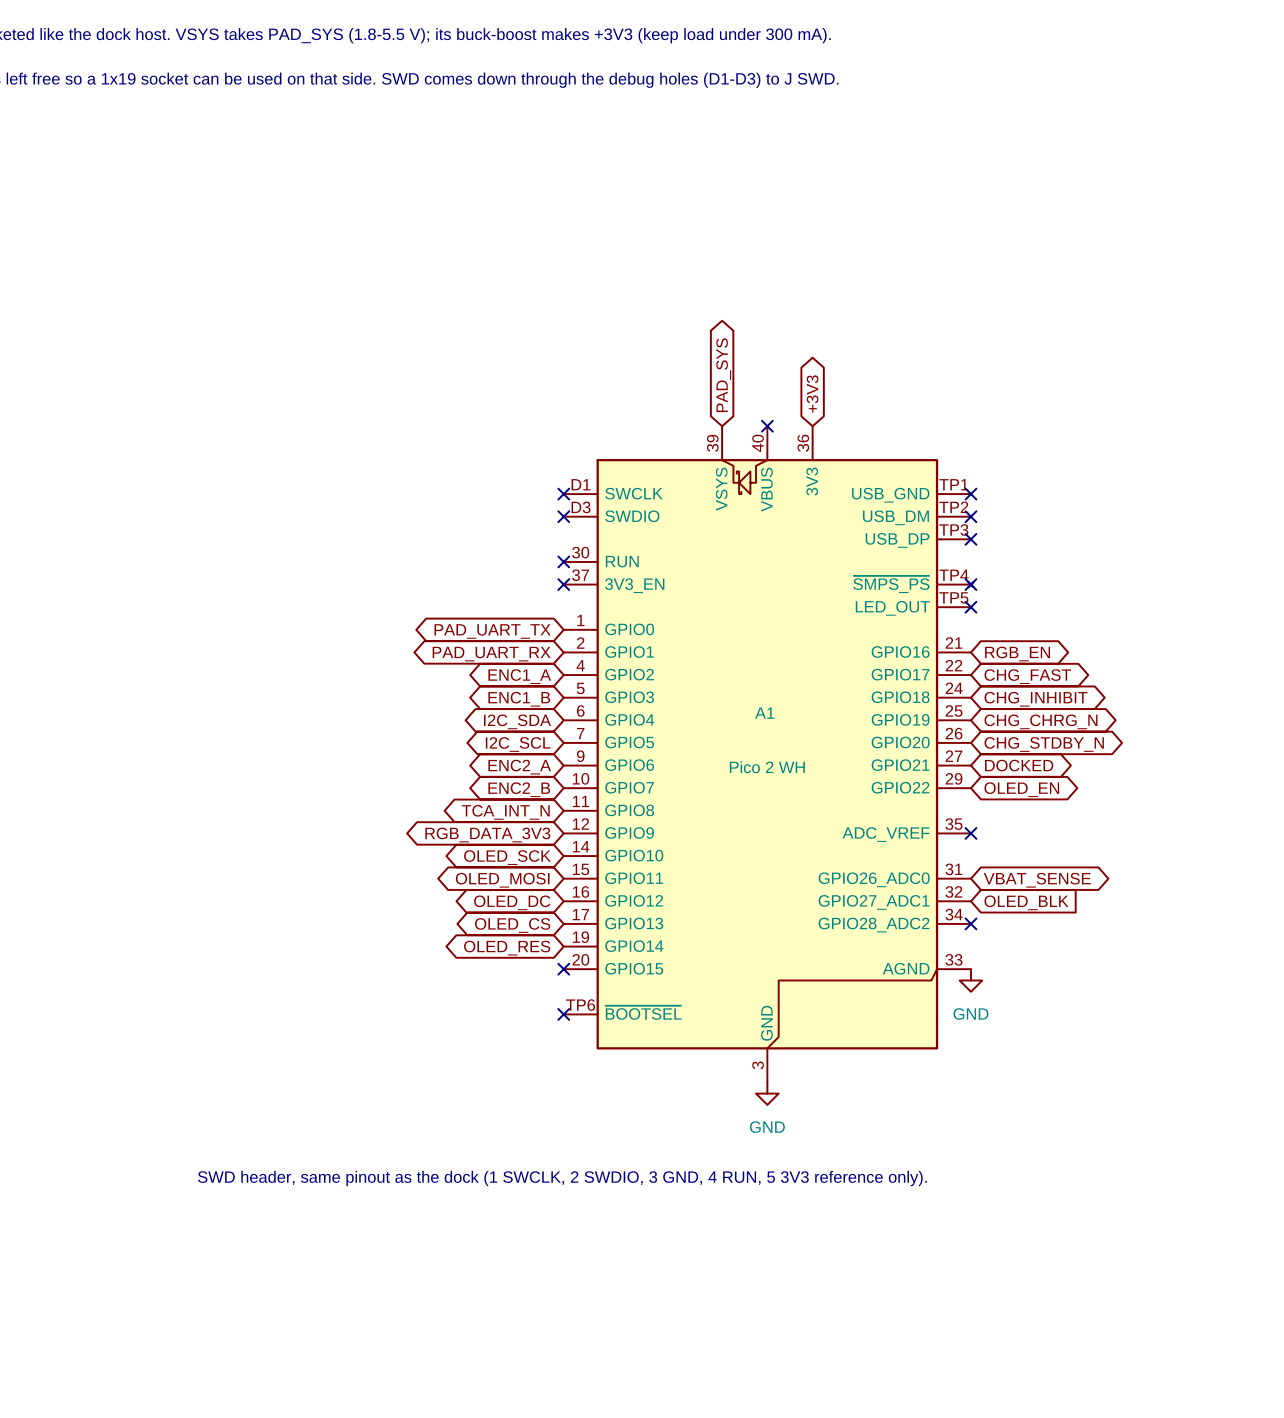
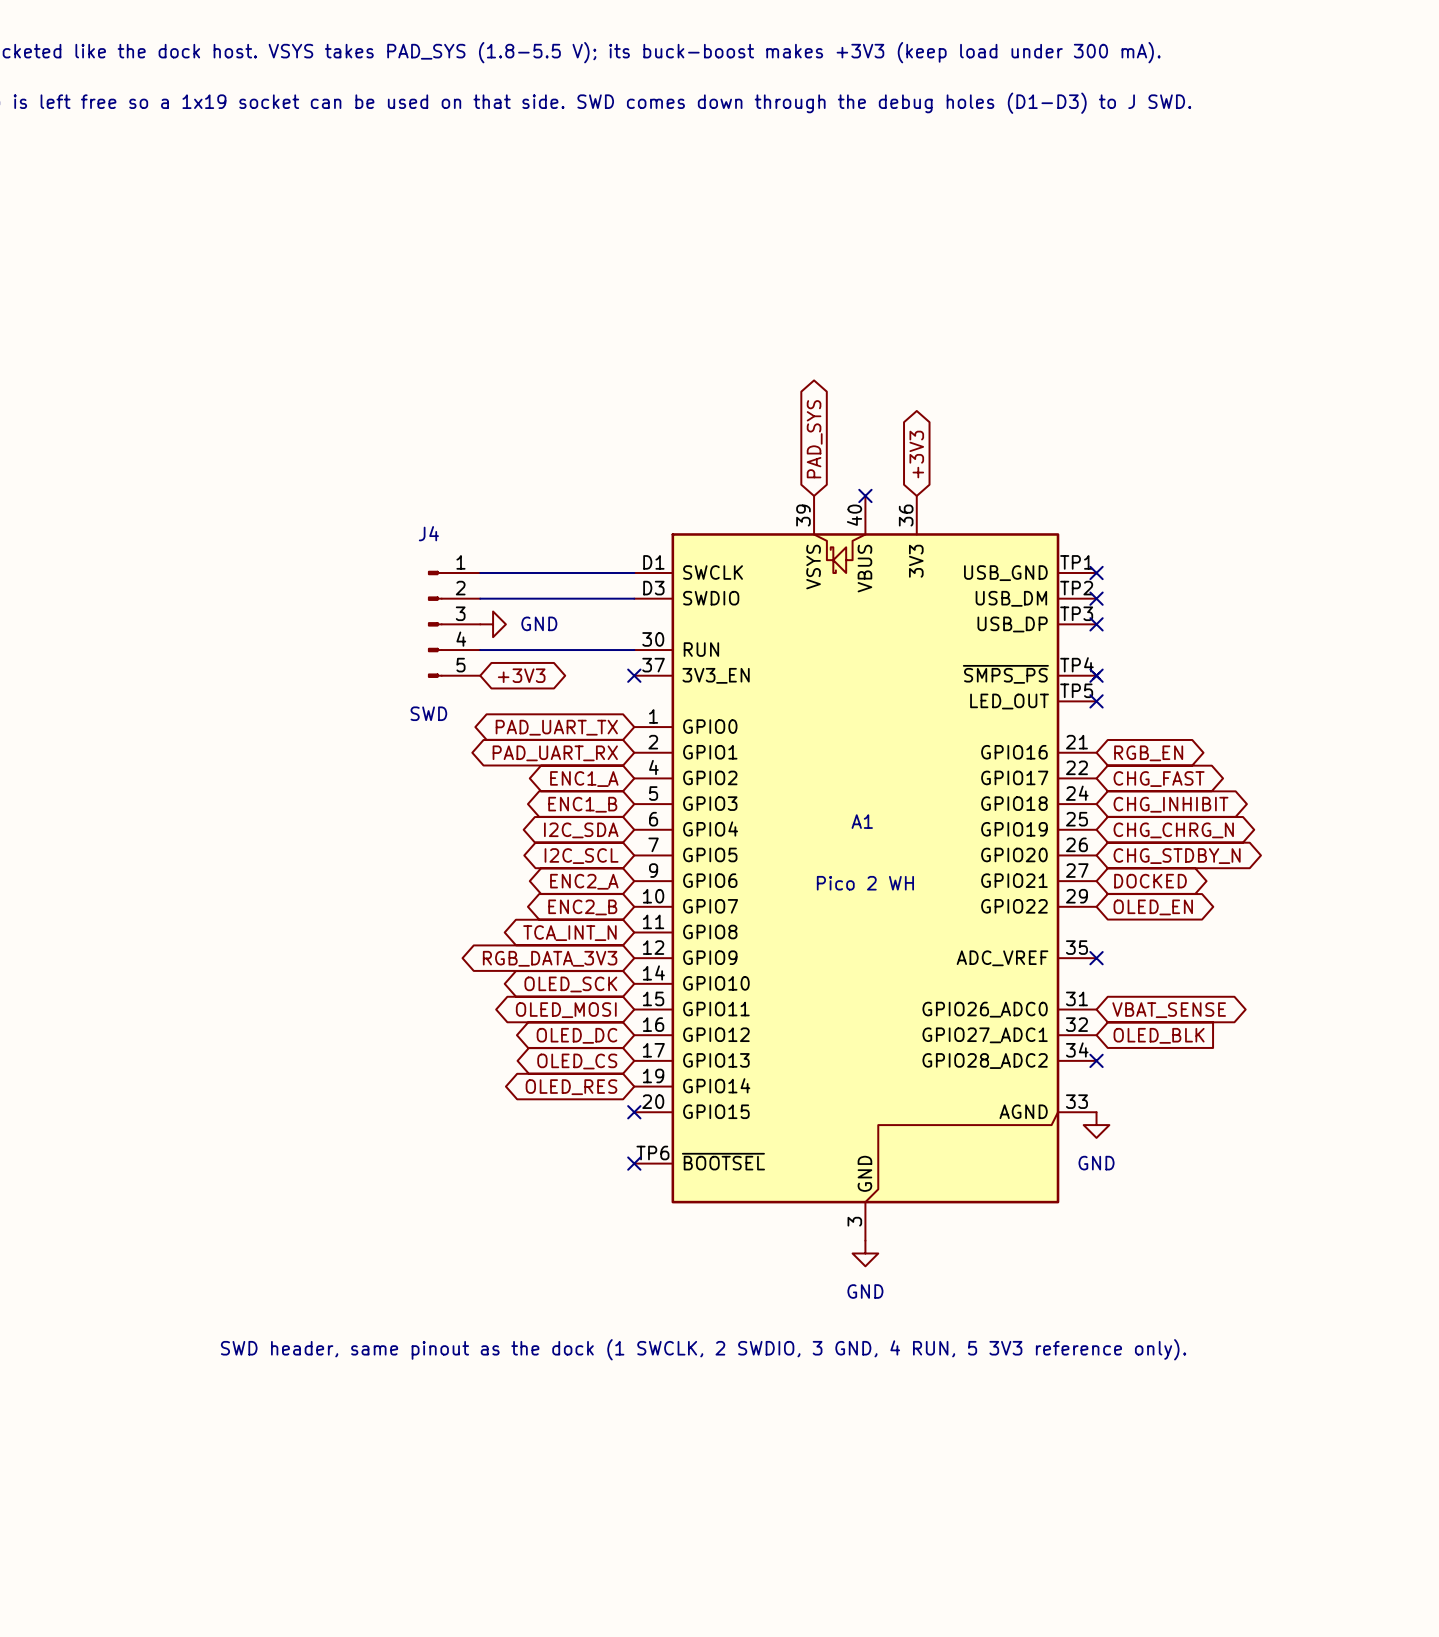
wire: none -> (480, 572) (634, 572)
no-connect mark: (563, 494) -> none
wire: none -> (480, 598) (634, 598)
no-connect mark: (563, 516) -> none
J4: none -> SWD (454, 624)
power symbol: none -> GND (493, 624)
wire: none -> (480, 650) (634, 650)
no-connect mark: (563, 561) -> none
global label: none -> +3V3 (521, 675)

